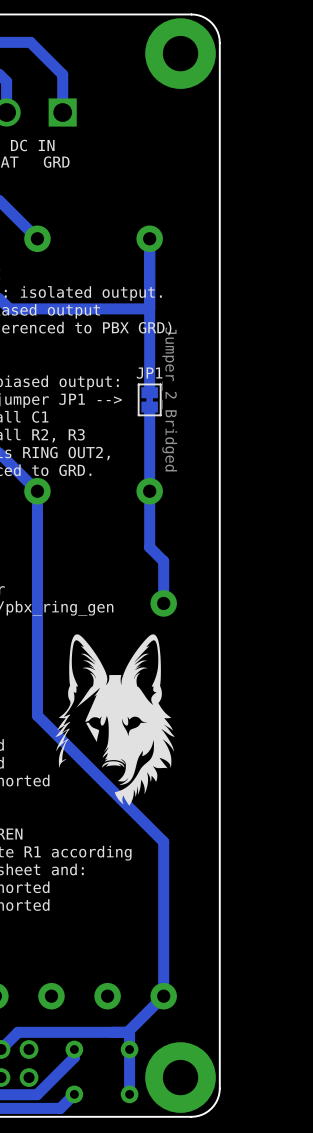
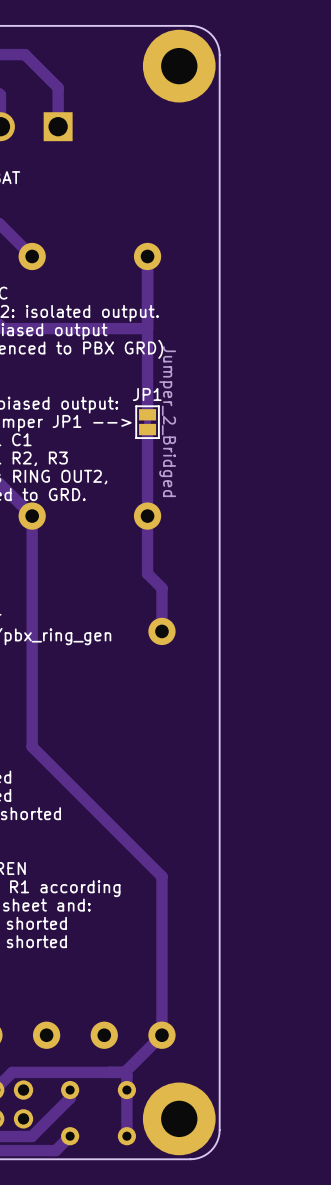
text: DC IN (32, 145) -> none
text: GRD (56, 162) -> none
drawing: [55, 634, 175, 806] -> none

